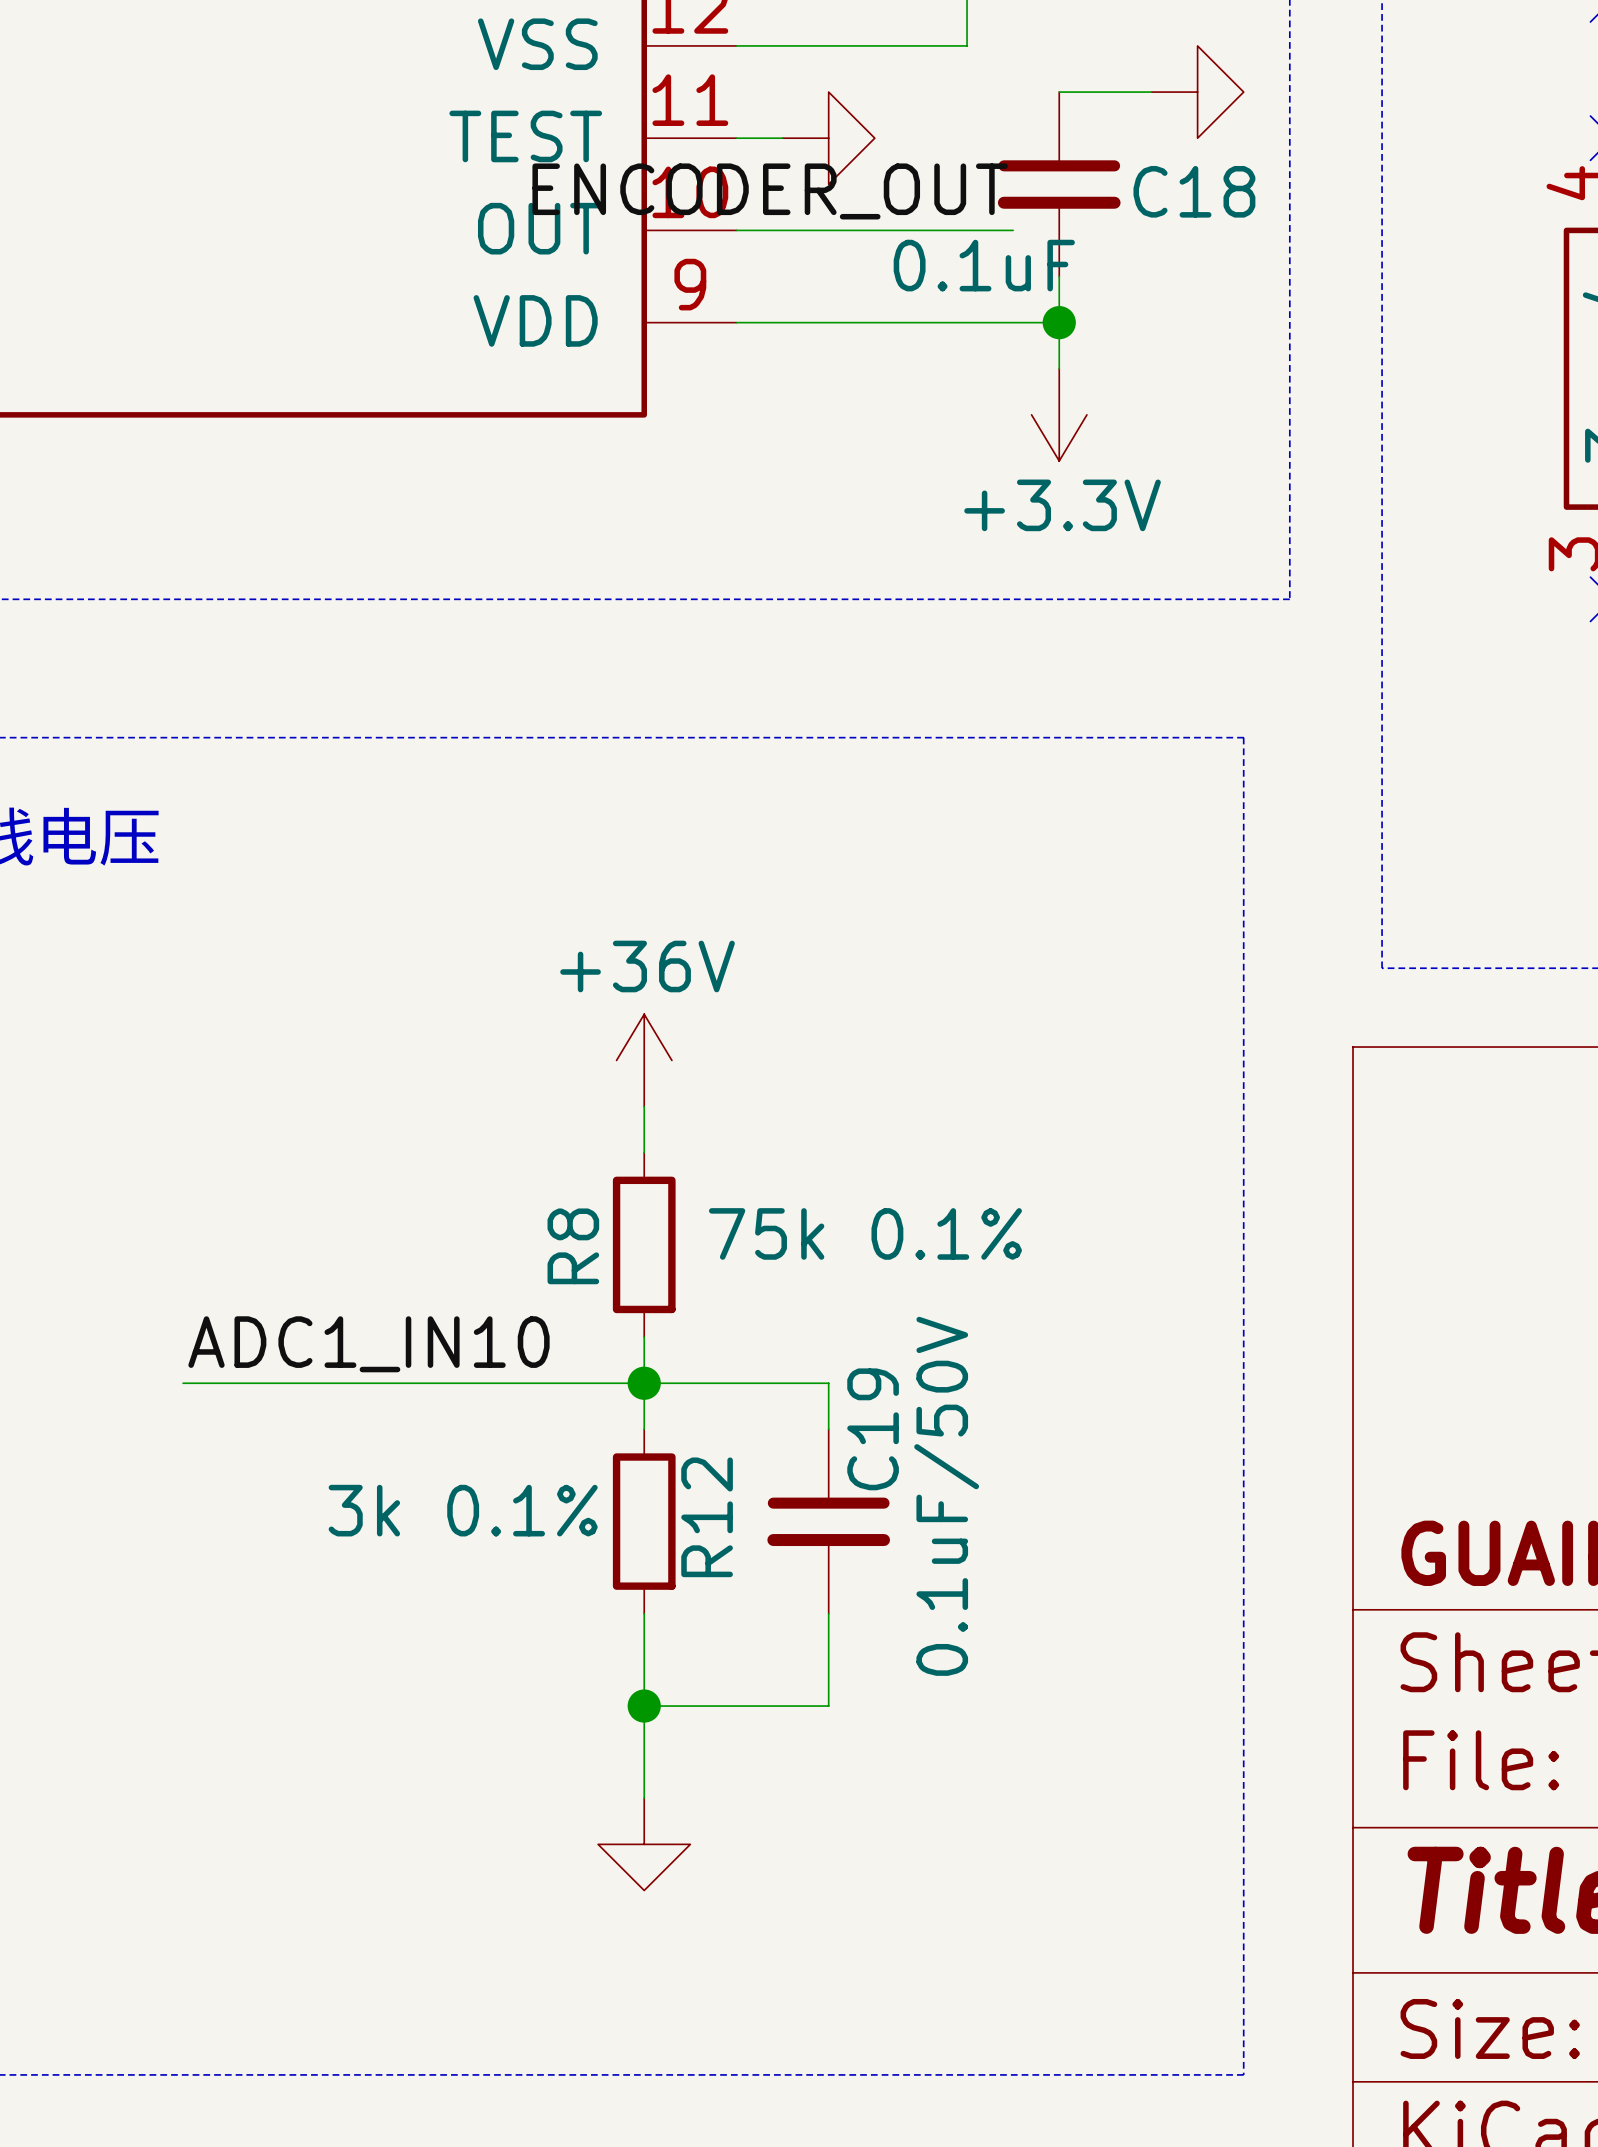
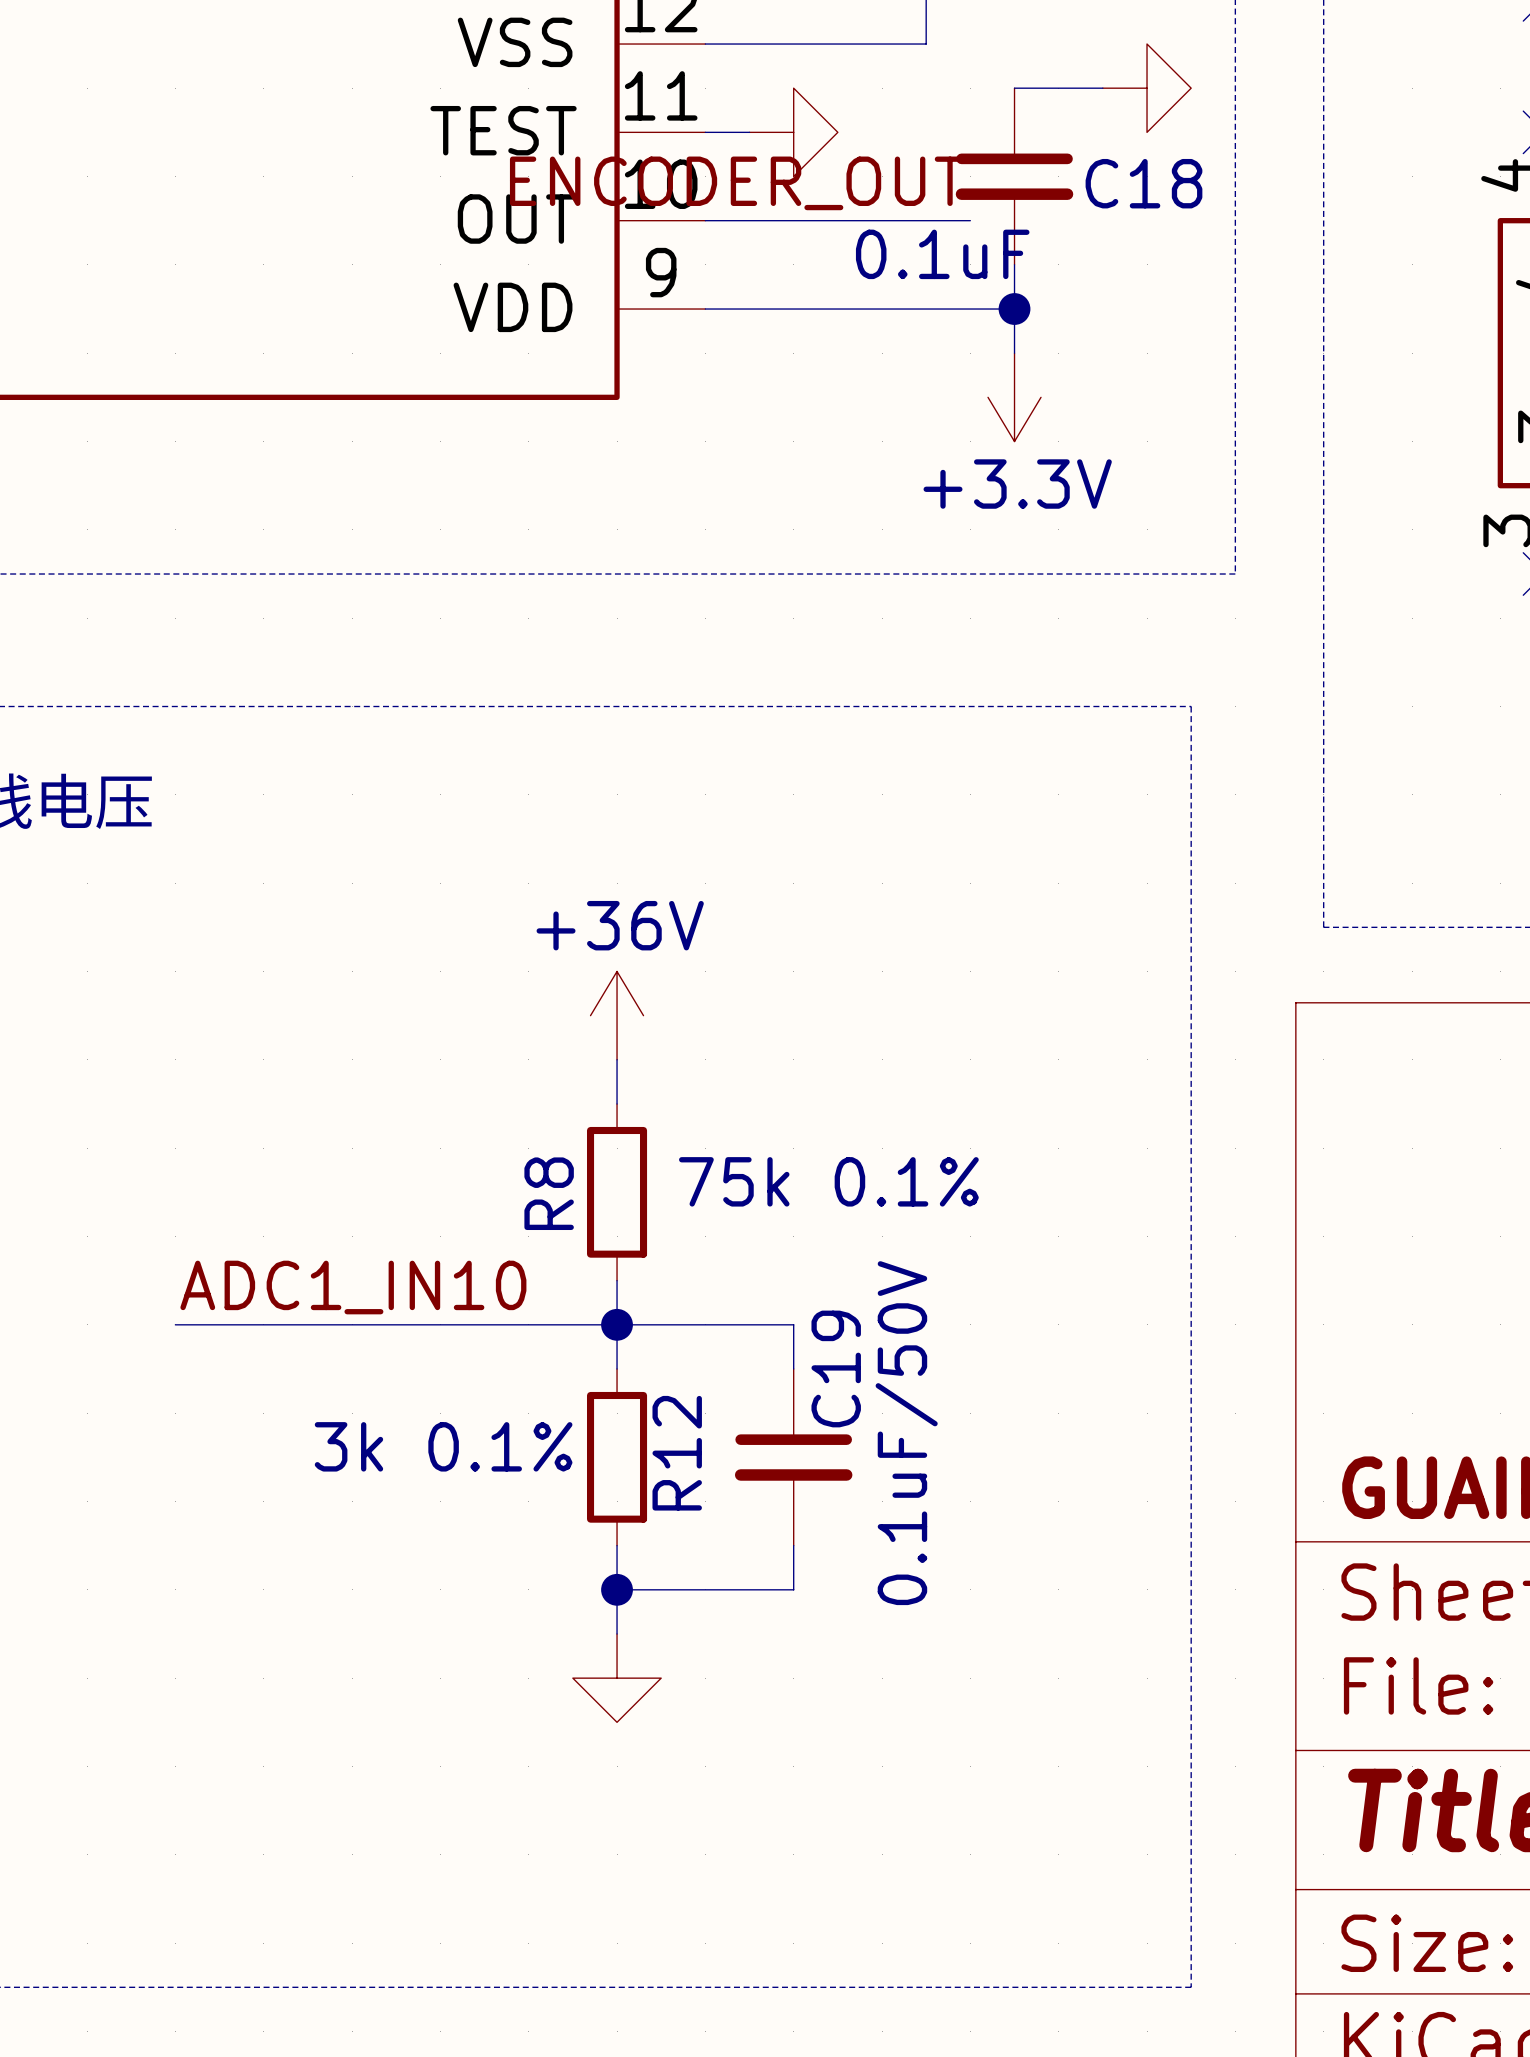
wire: (828, 1659) (828, 1706) (644, 1706) (644, 1798) -> (793, 1589) (617, 1589)
junction position: (644, 1706) -> (617, 1589)
power symbol position: (644, 1844) -> (617, 1678)

